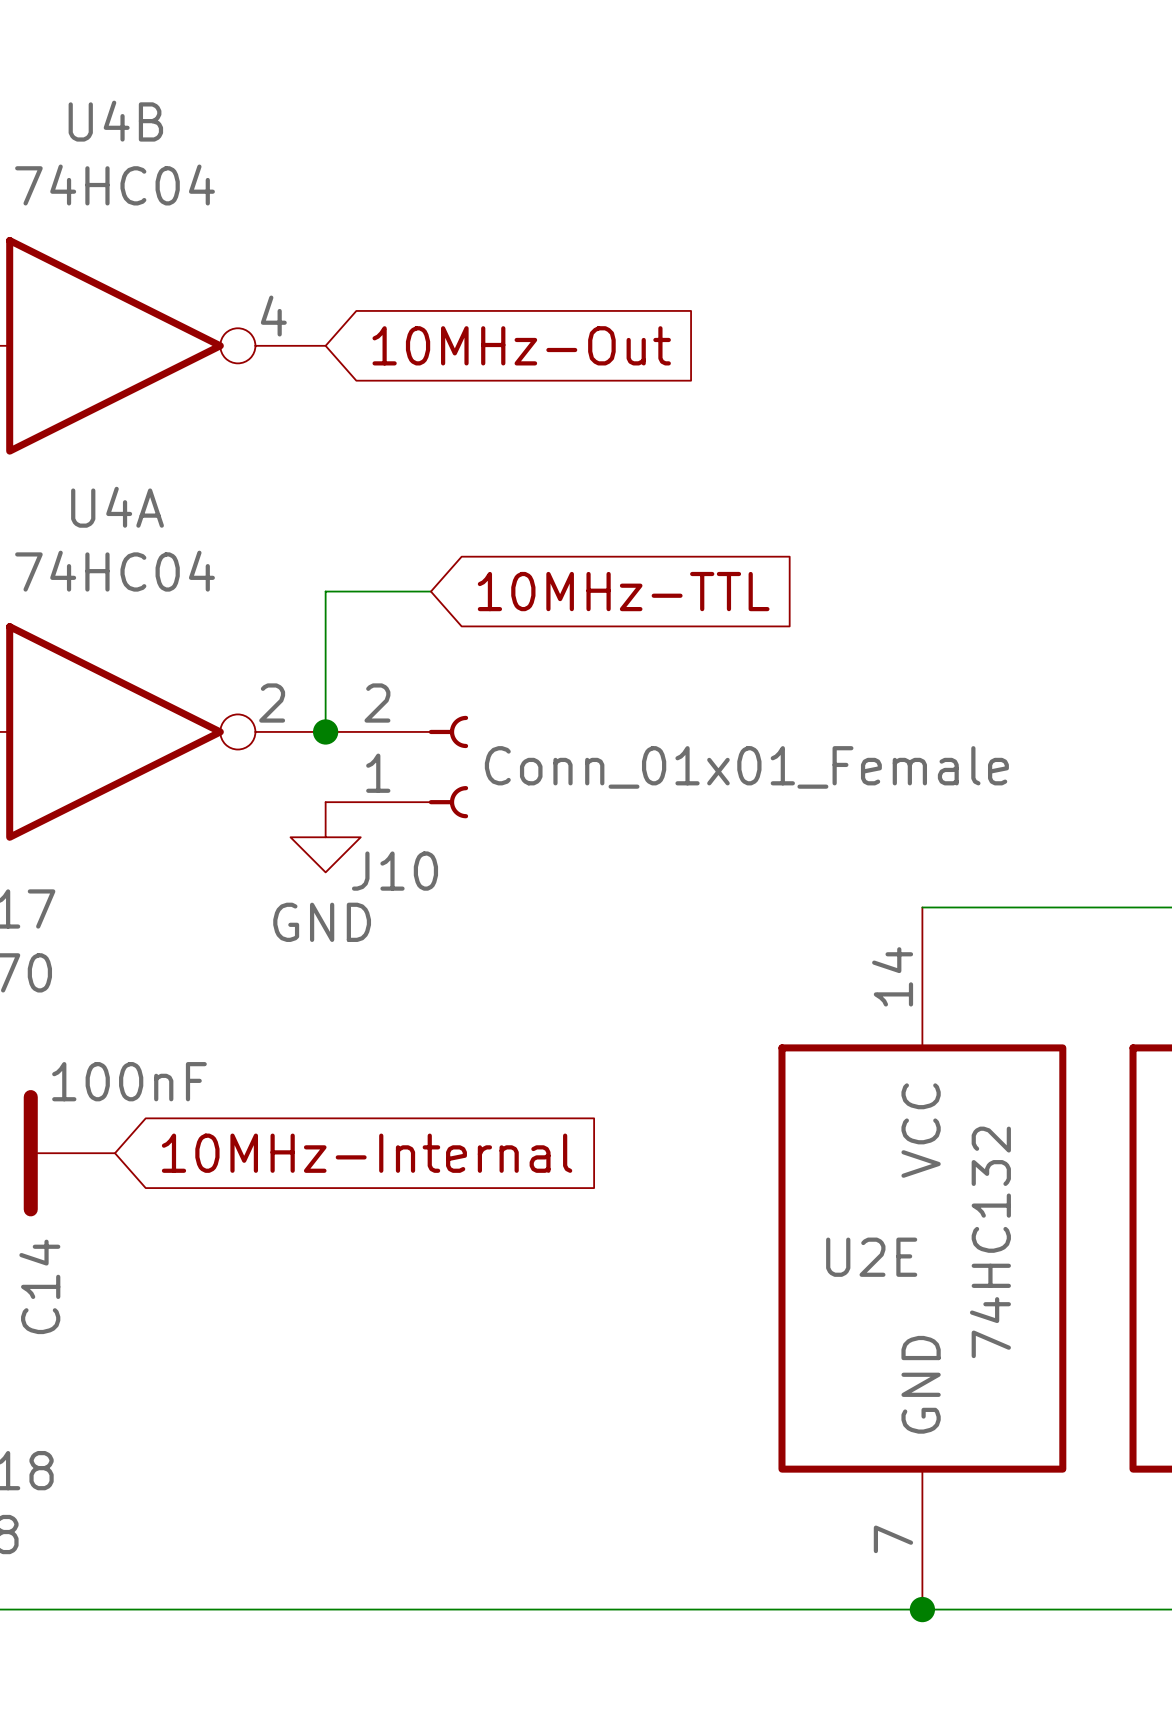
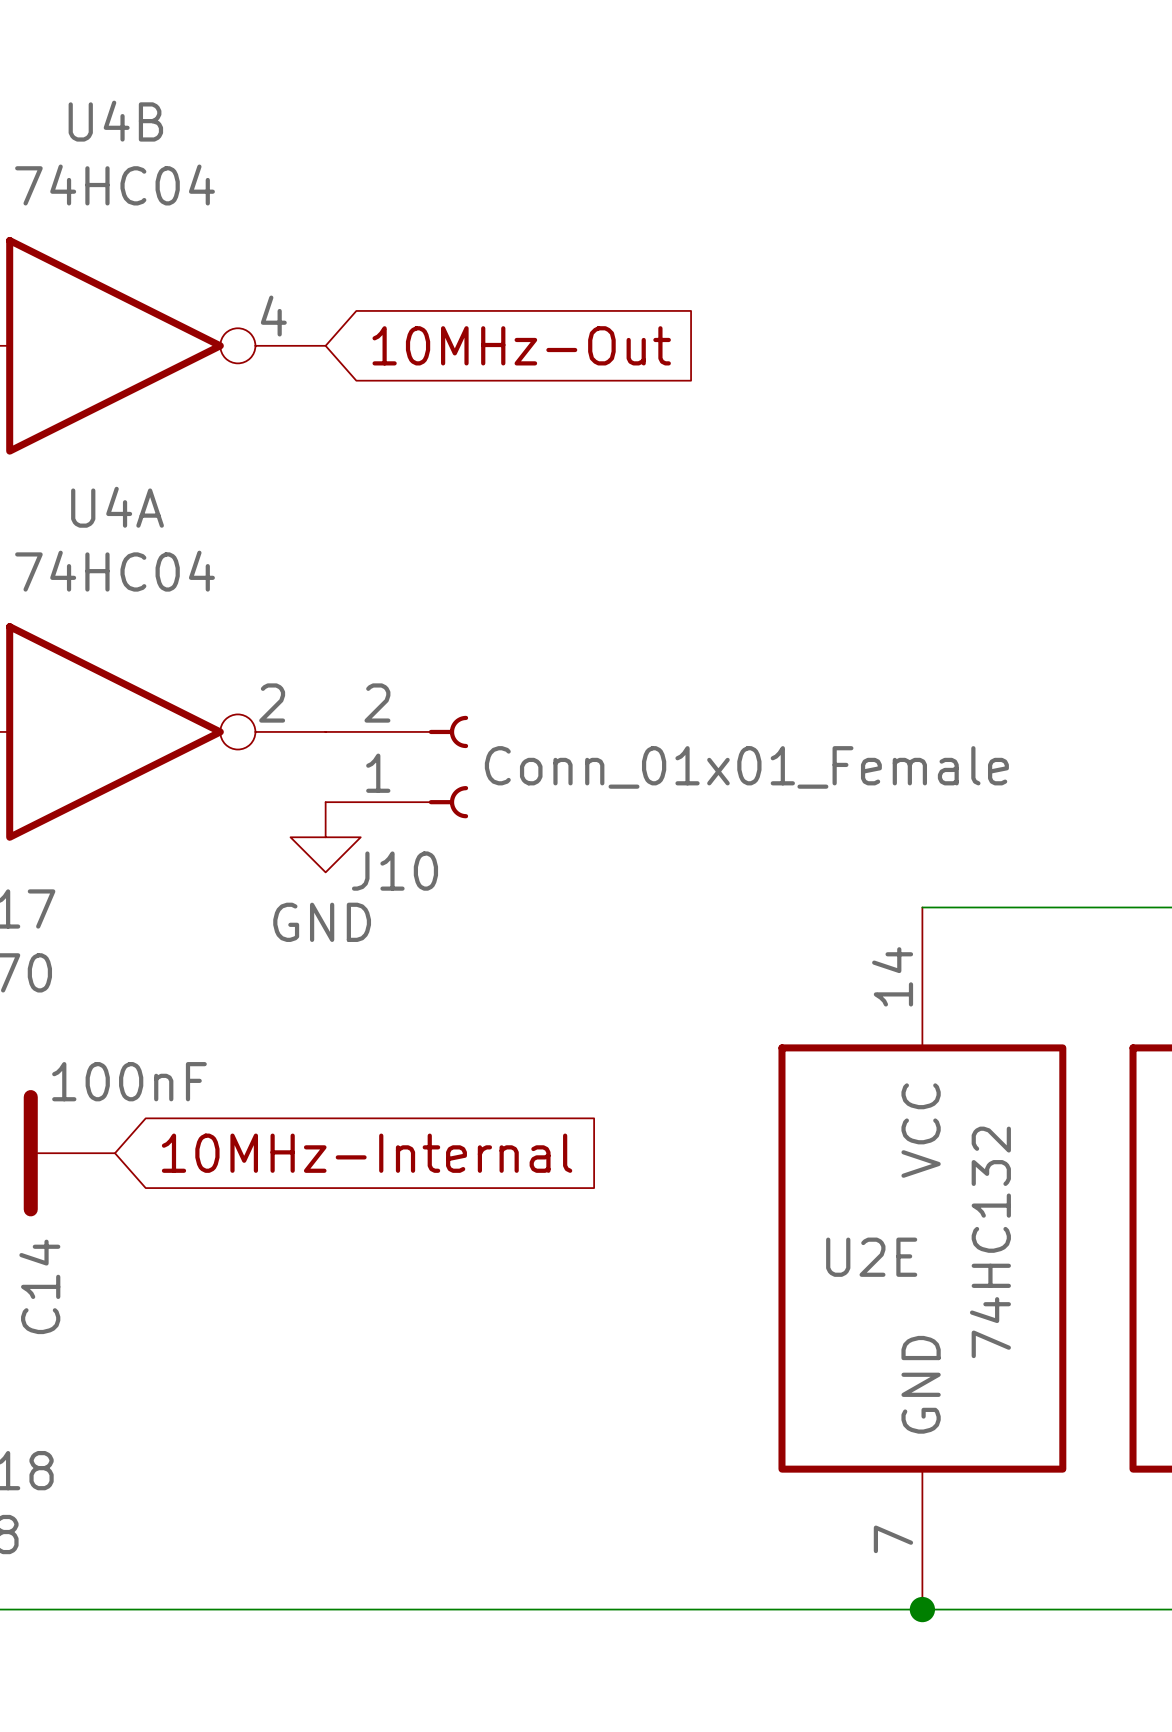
wire: (430, 591) (325, 591) (325, 731) -> none
global label: 10MHz-TTL (623, 591) -> none
junction: (325, 731) -> none

